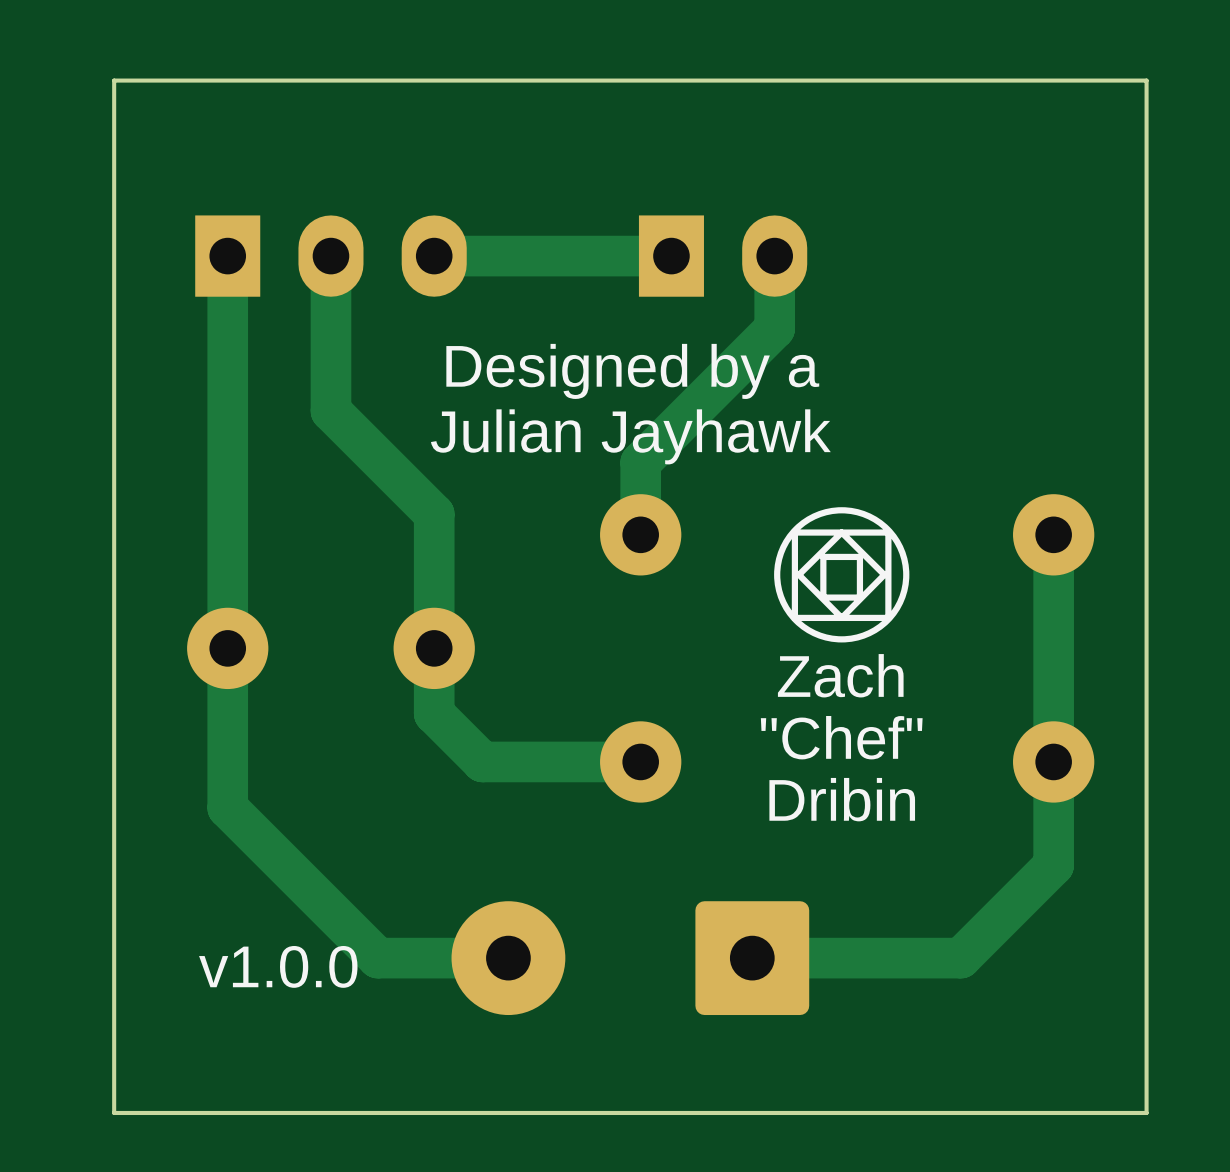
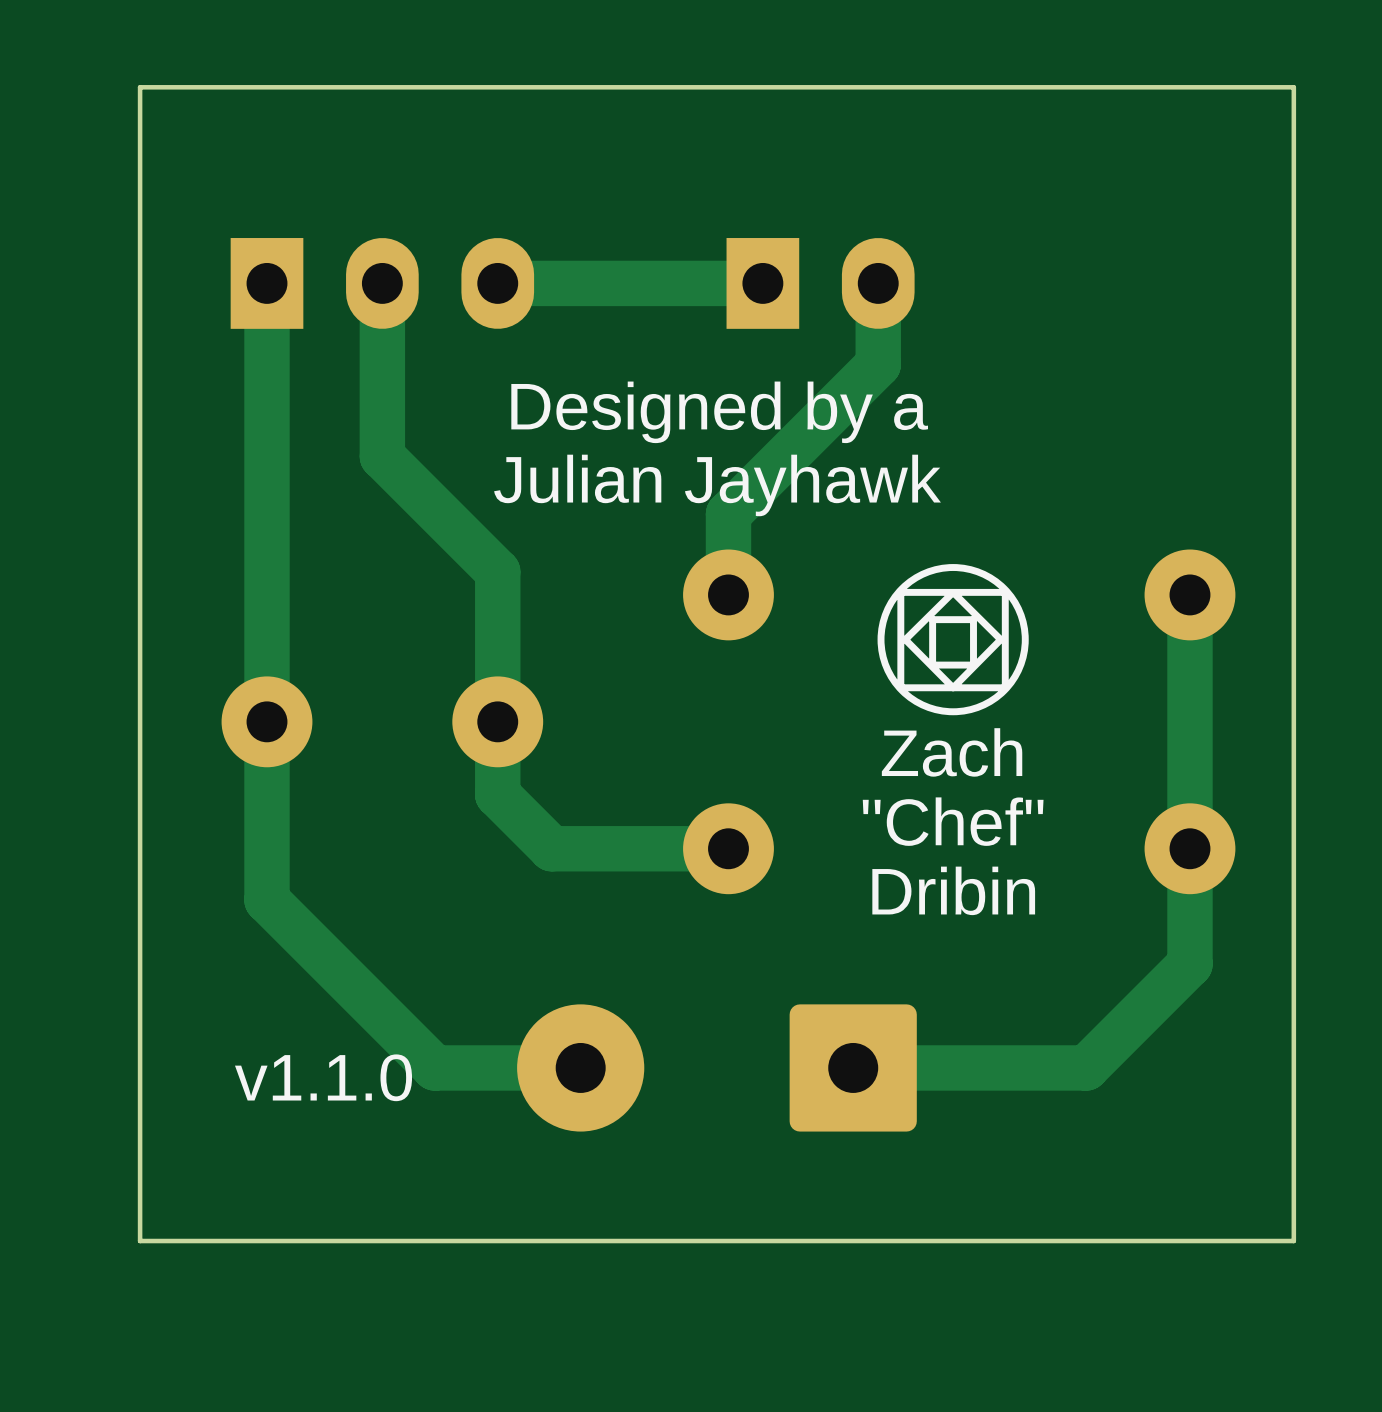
text: v1.0.0 (278, 966) -> v1.1.0 (323, 1077)

